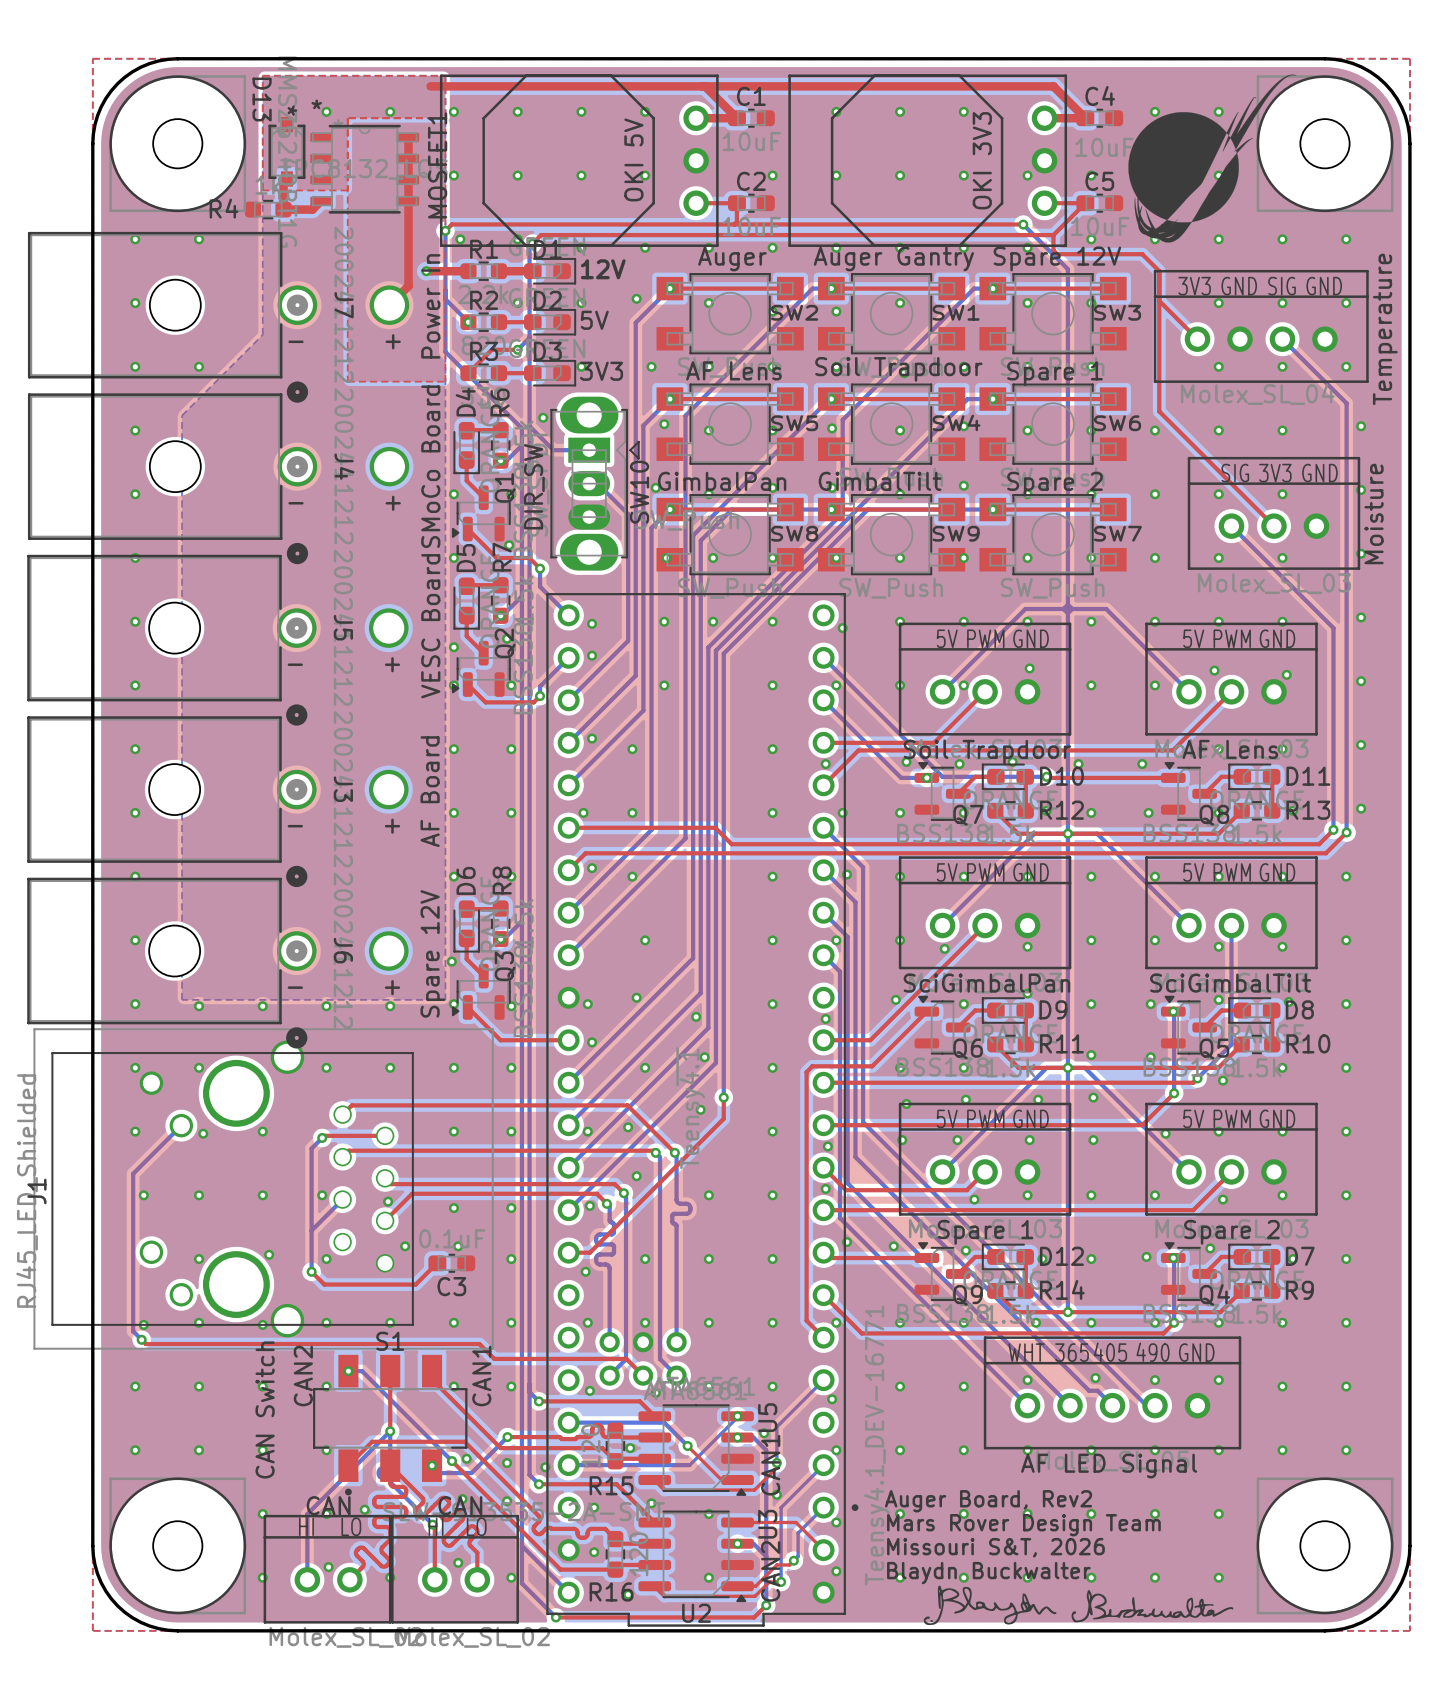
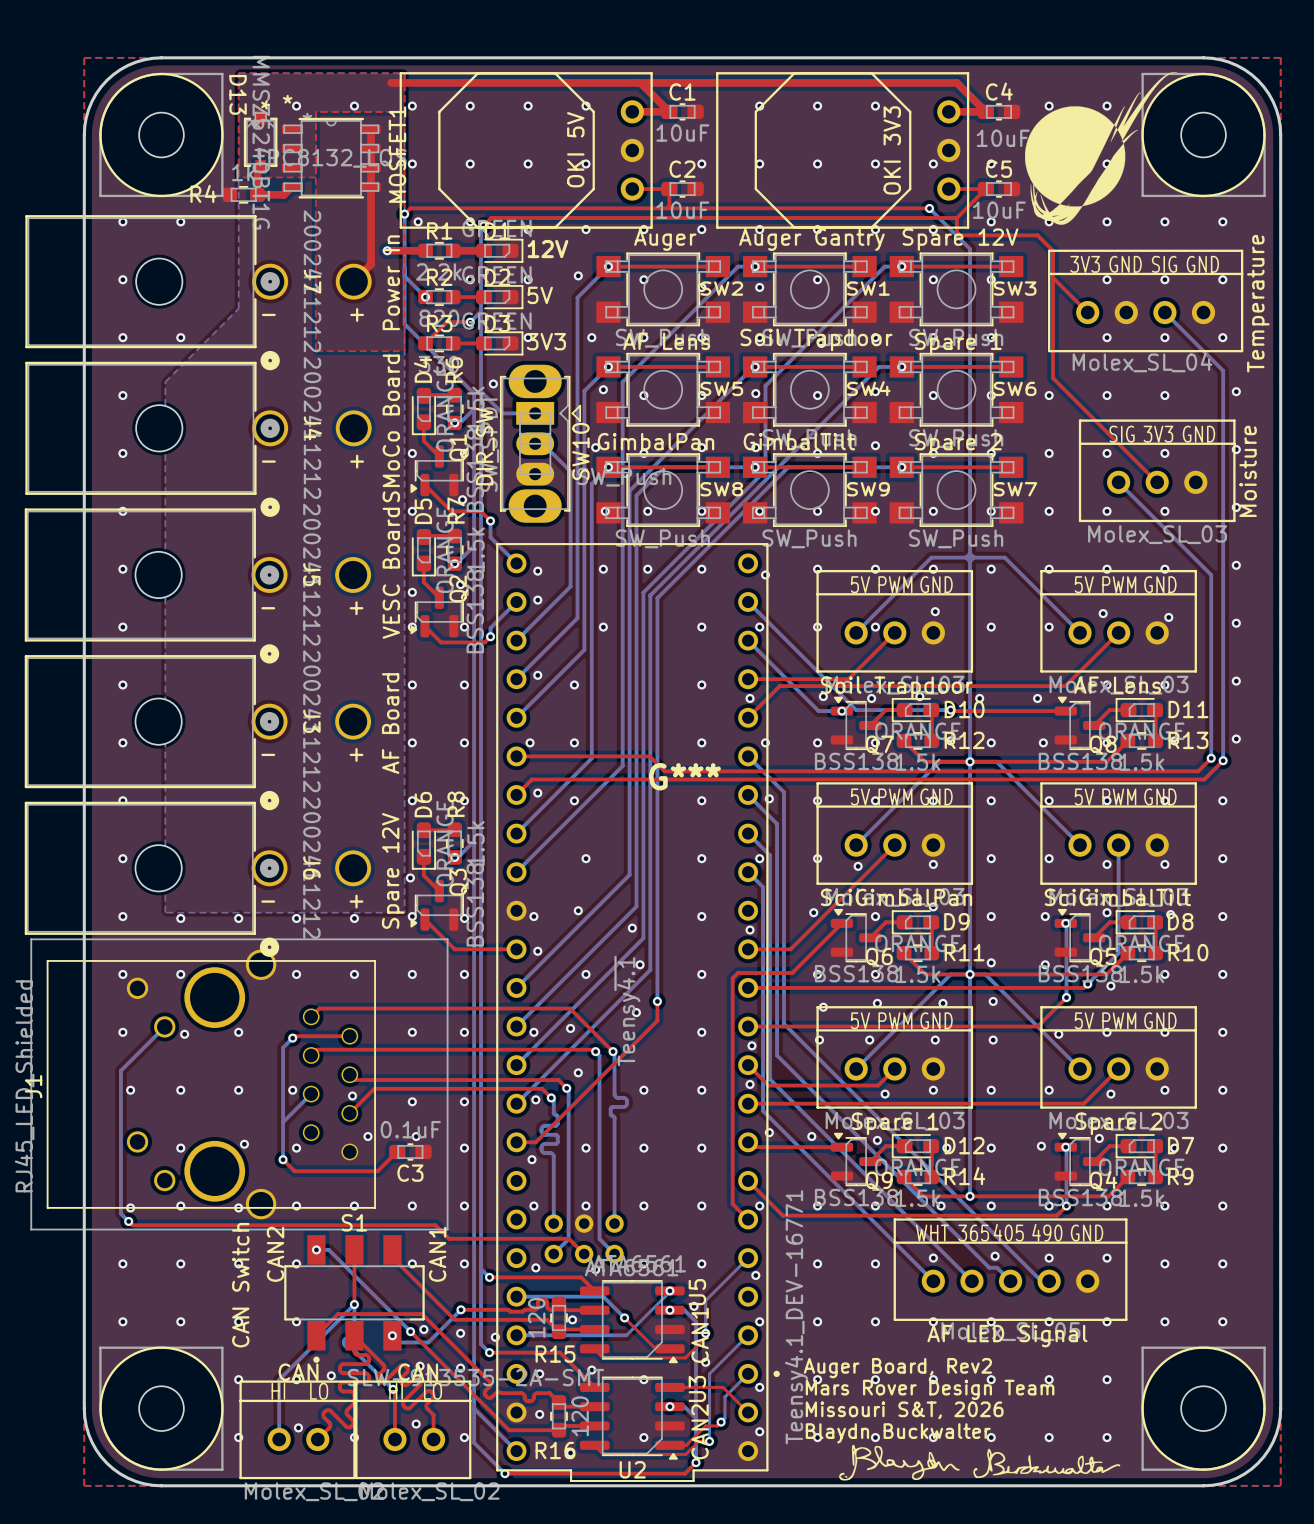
G***: none -> (684, 776)

